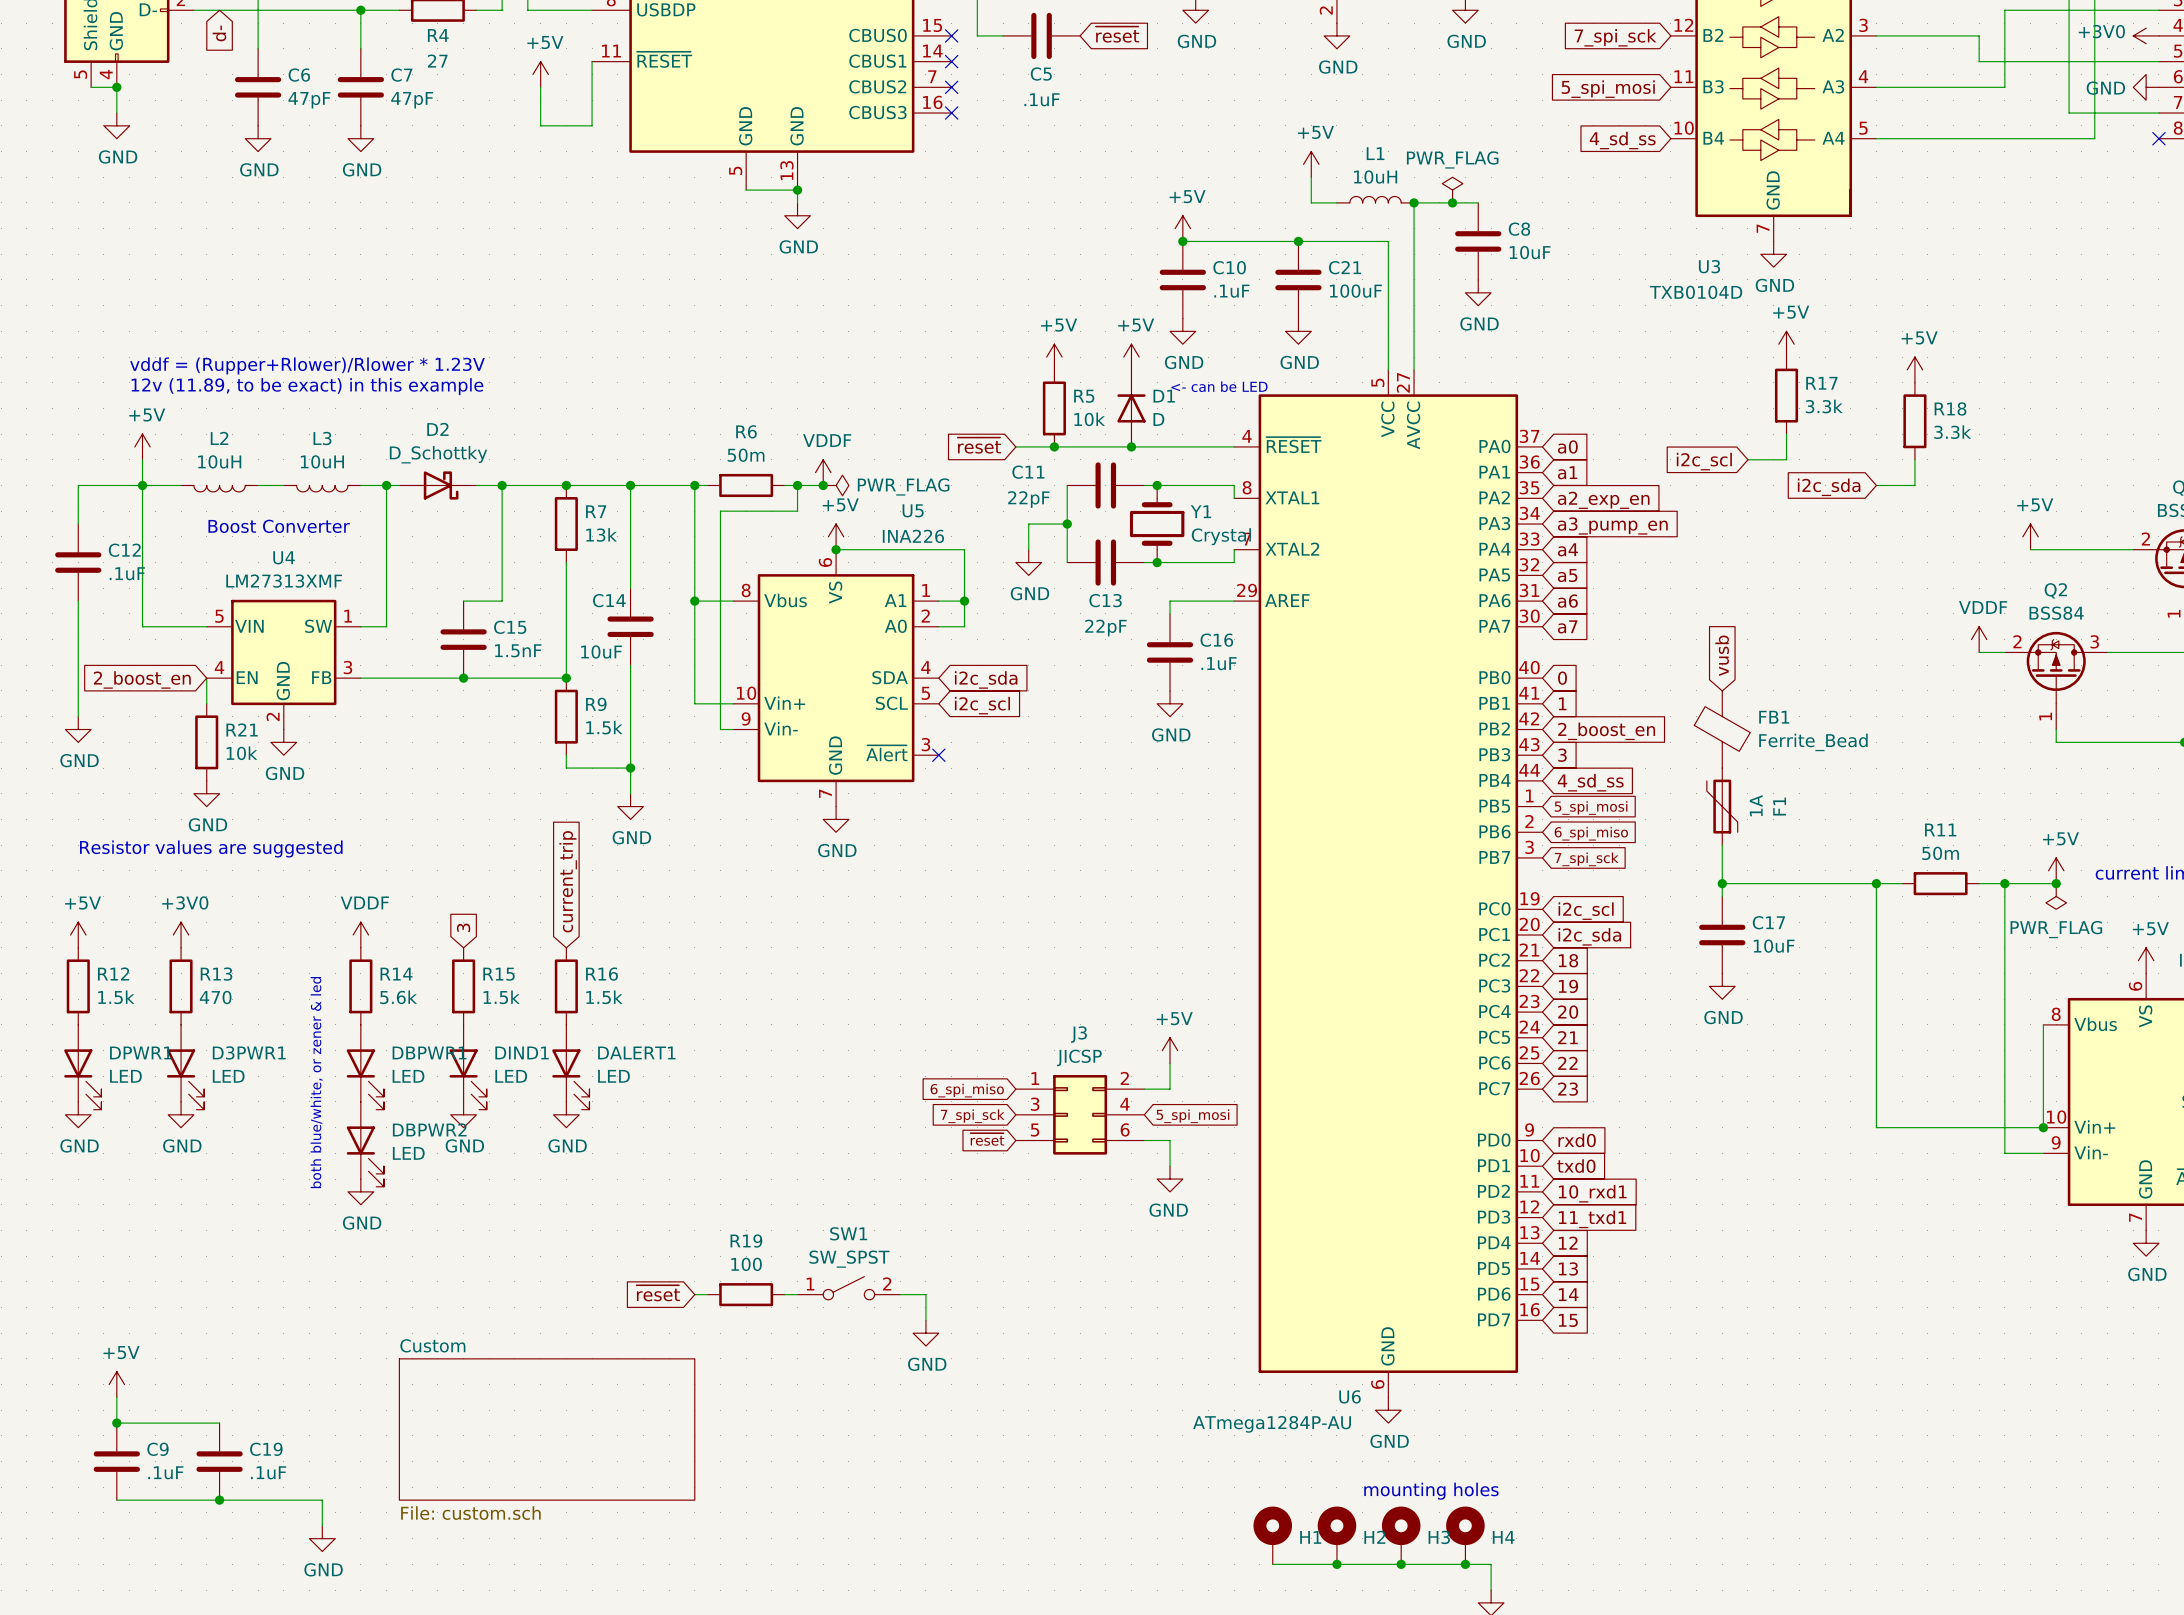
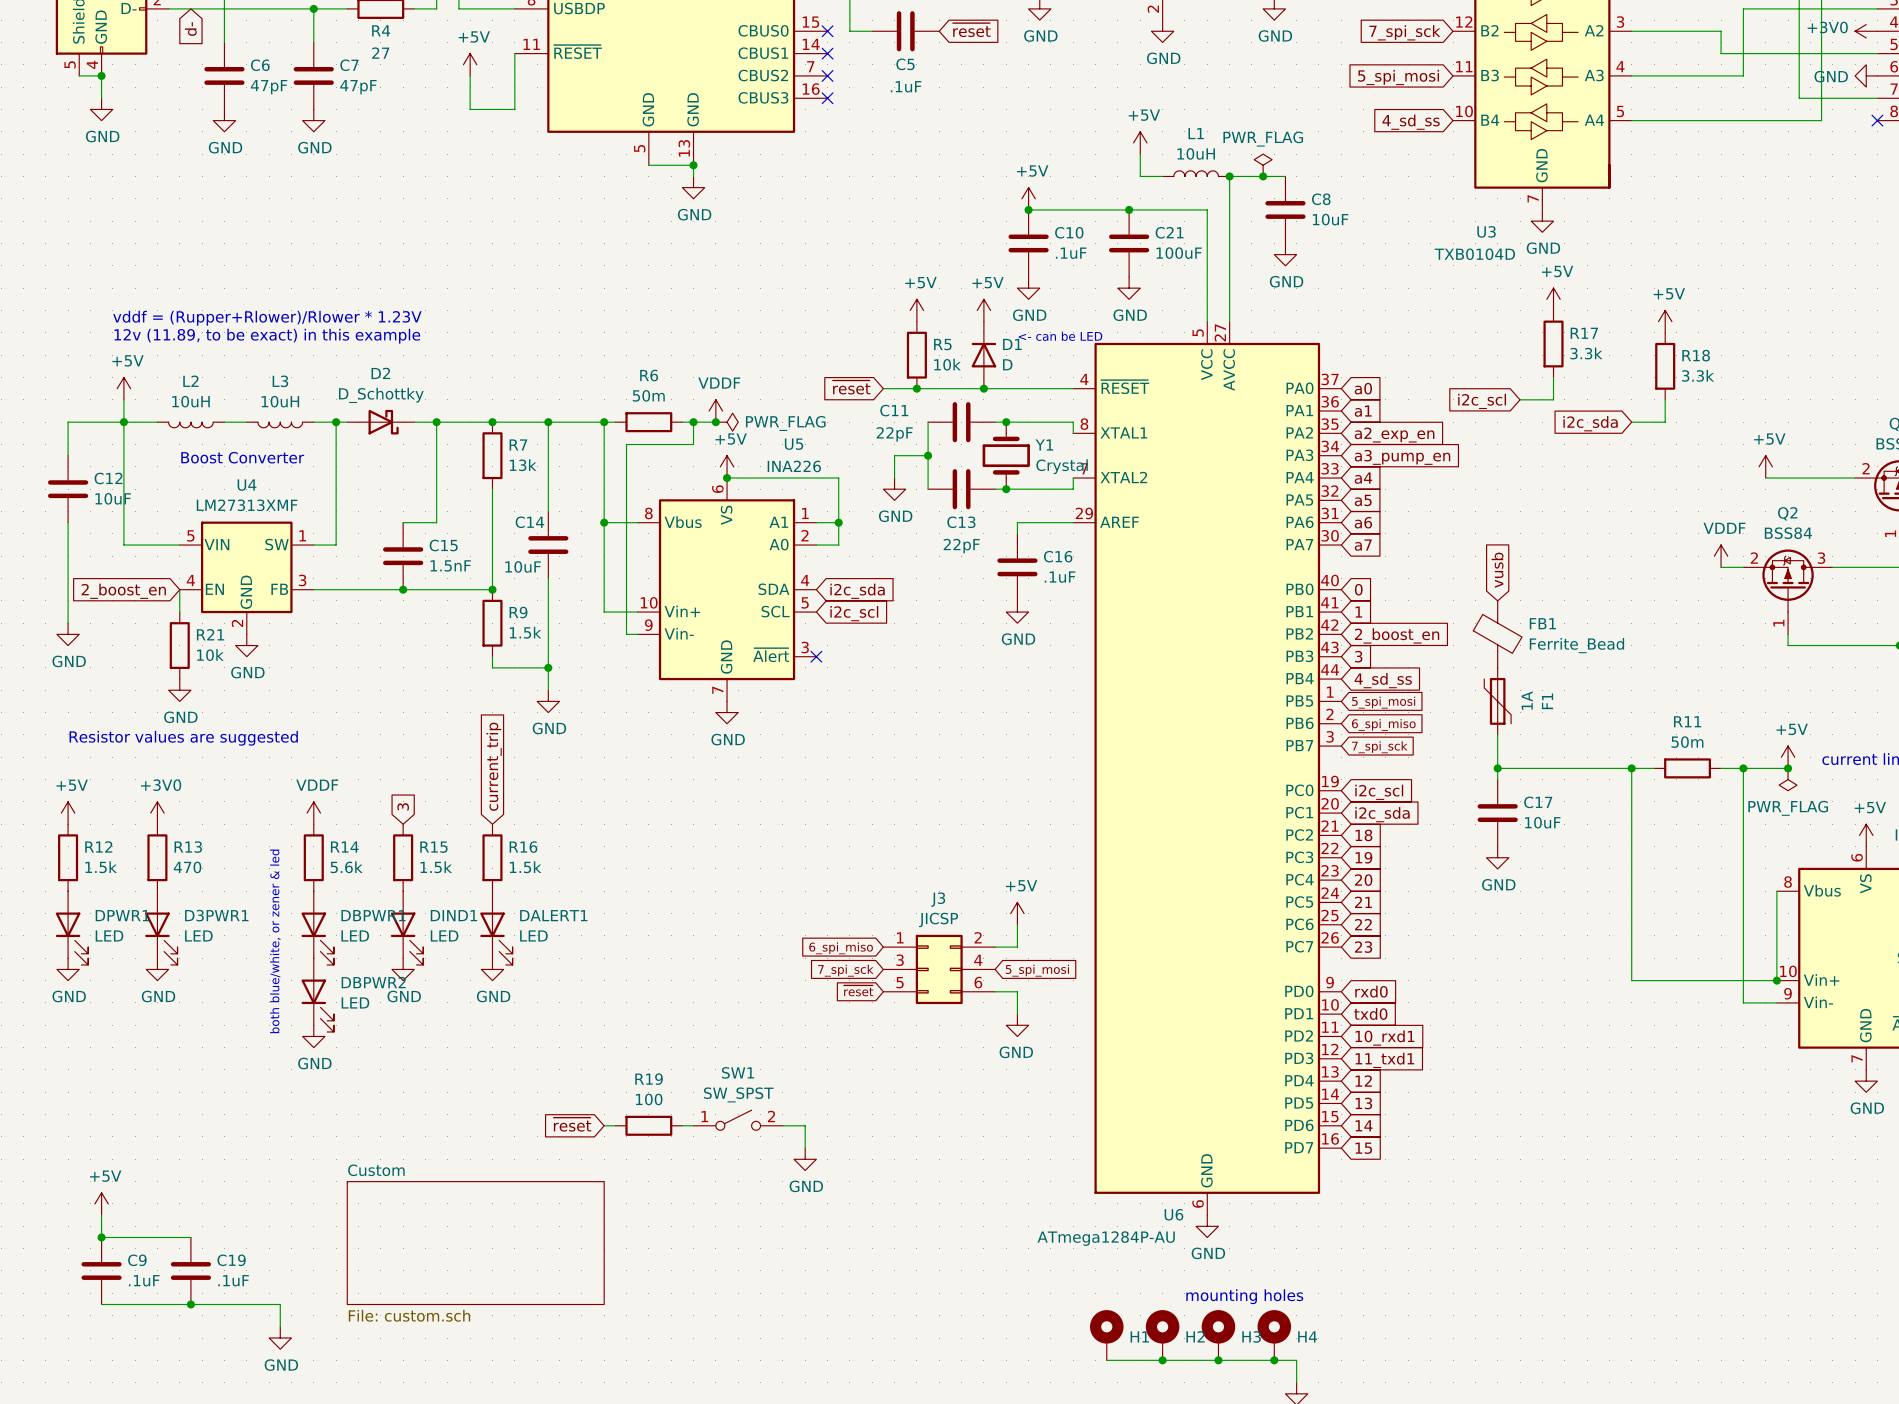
C12 value: .1uF (127, 573) -> 10uF (113, 498)

